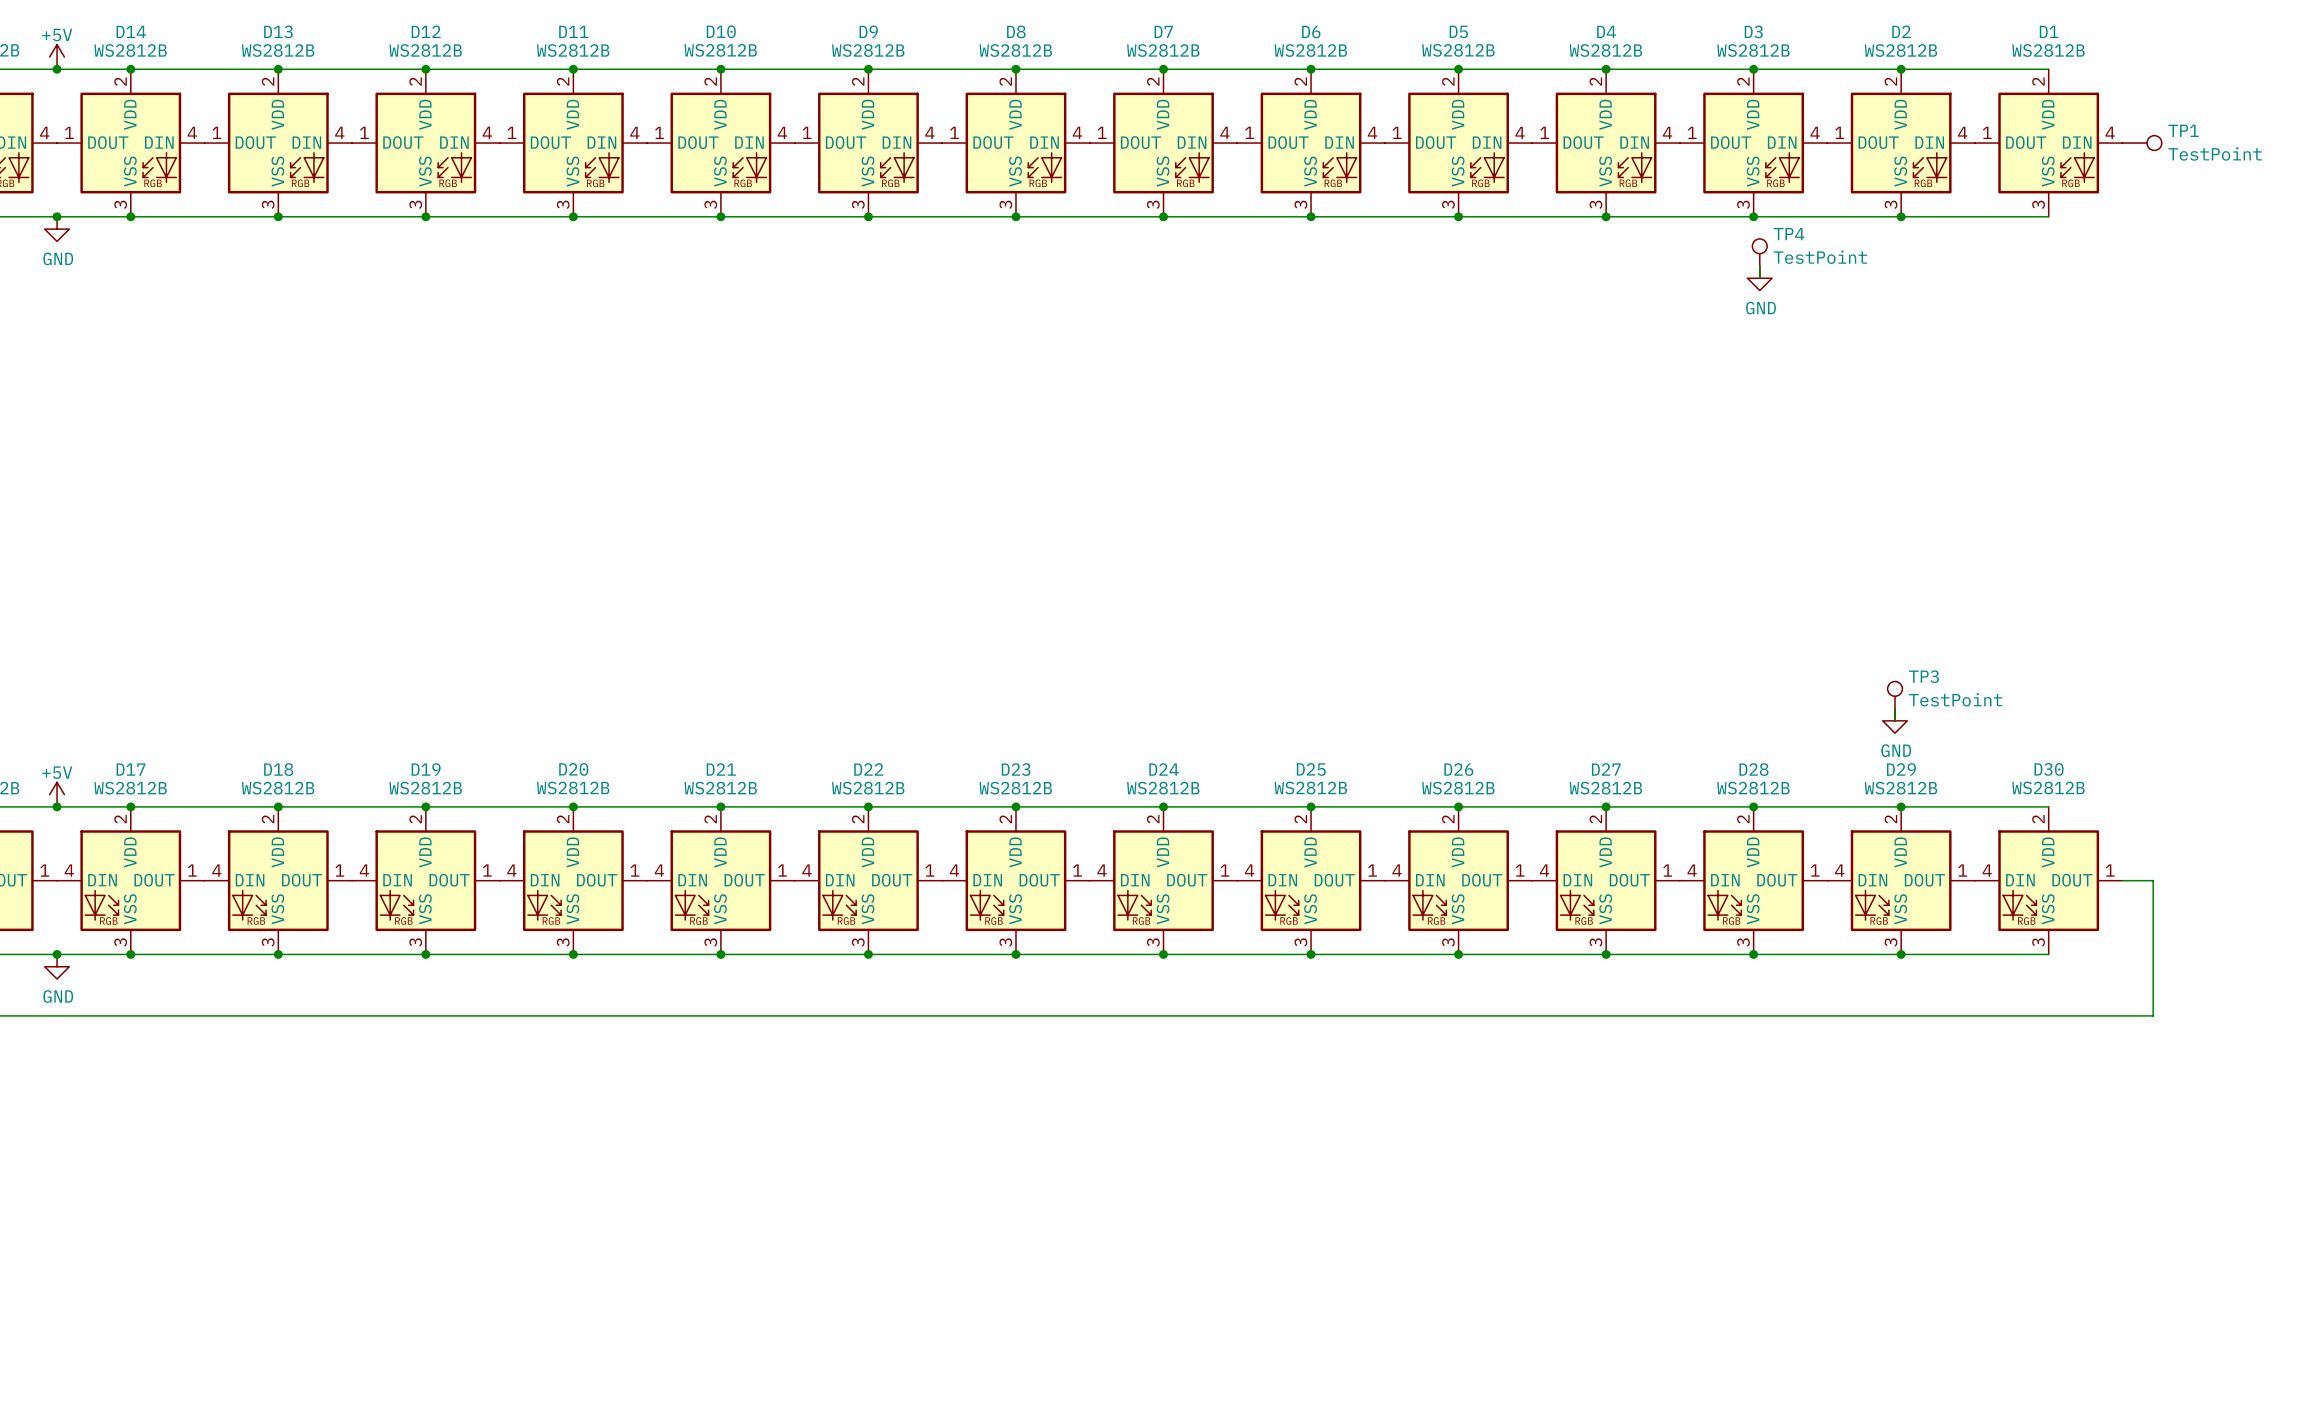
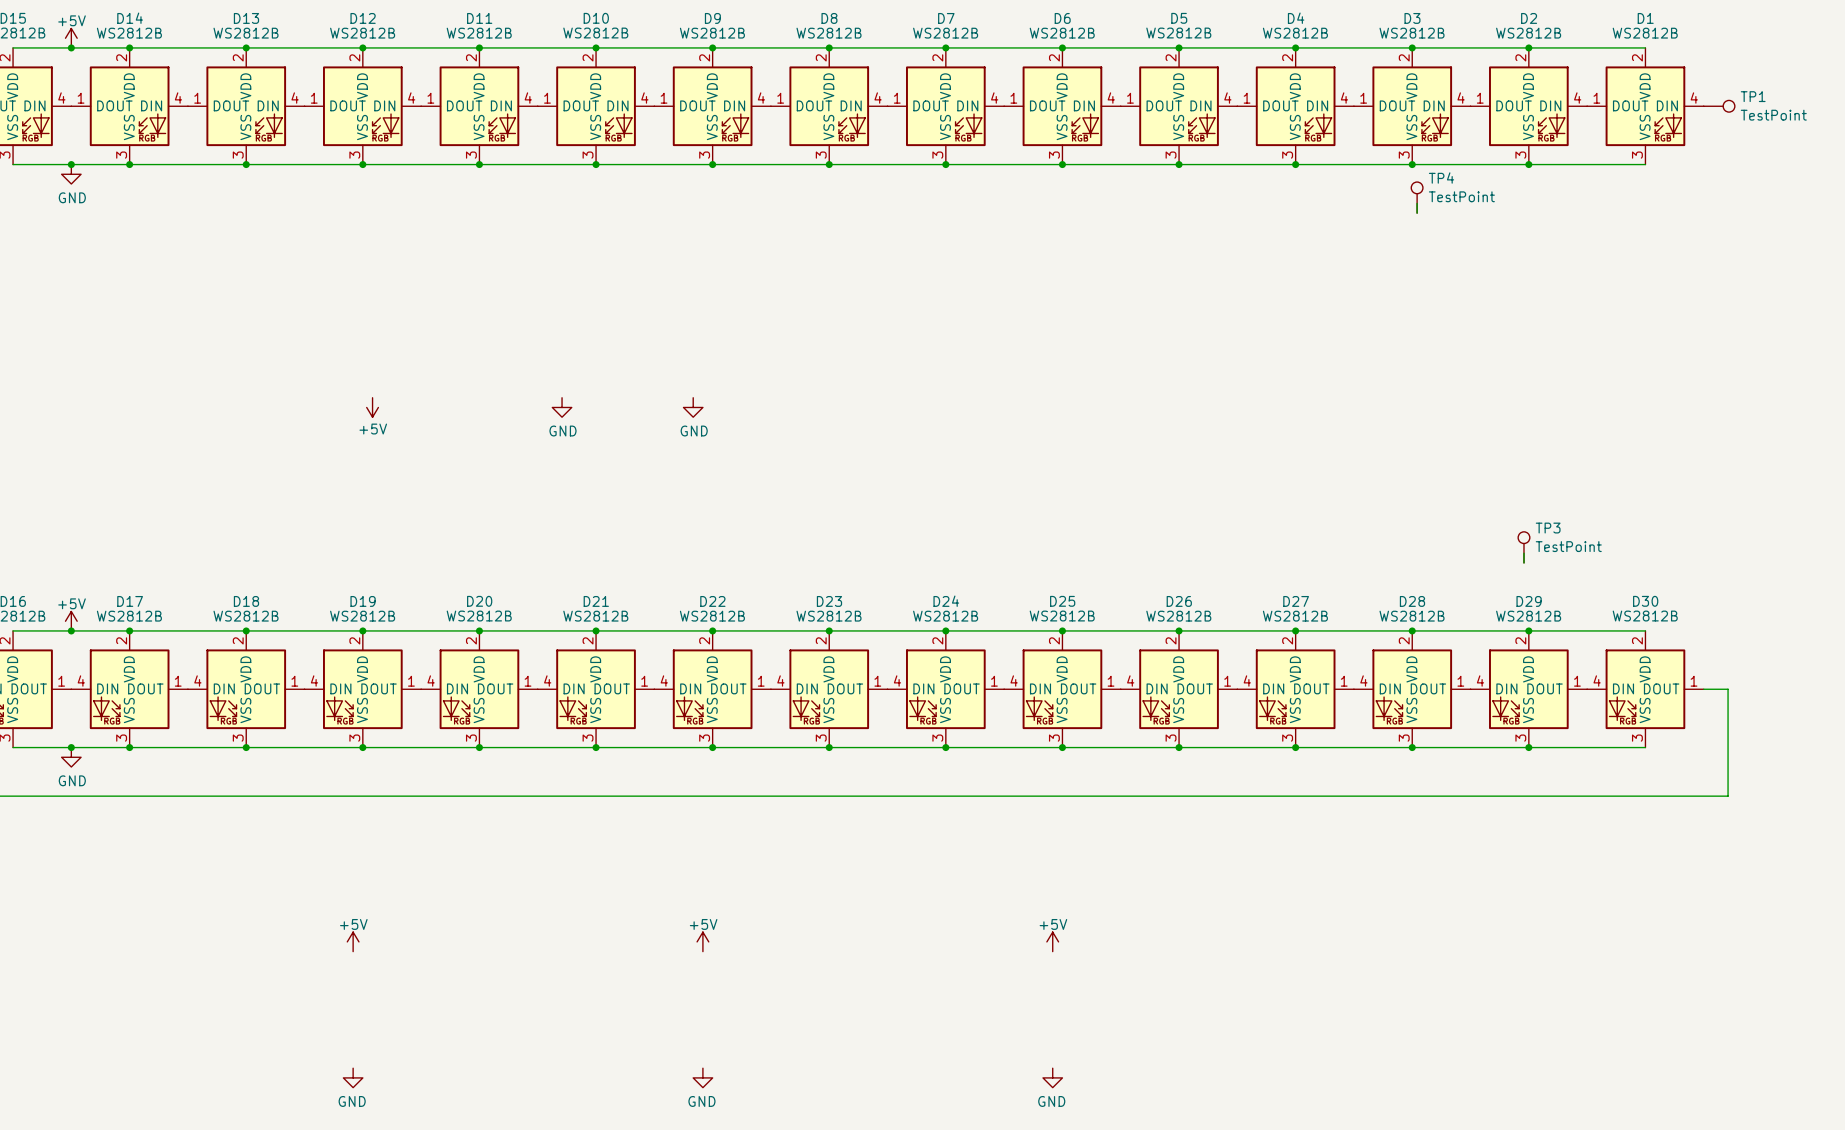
power symbol: GND (1759, 278) -> none
power symbol: none -> +5V (372, 407)
power symbol: none -> GND (562, 407)
power symbol: none -> GND (693, 407)
power symbol: GND (1895, 720) -> none
power symbol: none -> +5V (353, 941)
power symbol: none -> +5V (702, 941)
power symbol: none -> +5V (1052, 941)
power symbol: none -> GND (353, 1077)
power symbol: none -> GND (702, 1077)
power symbol: none -> GND (1052, 1077)

